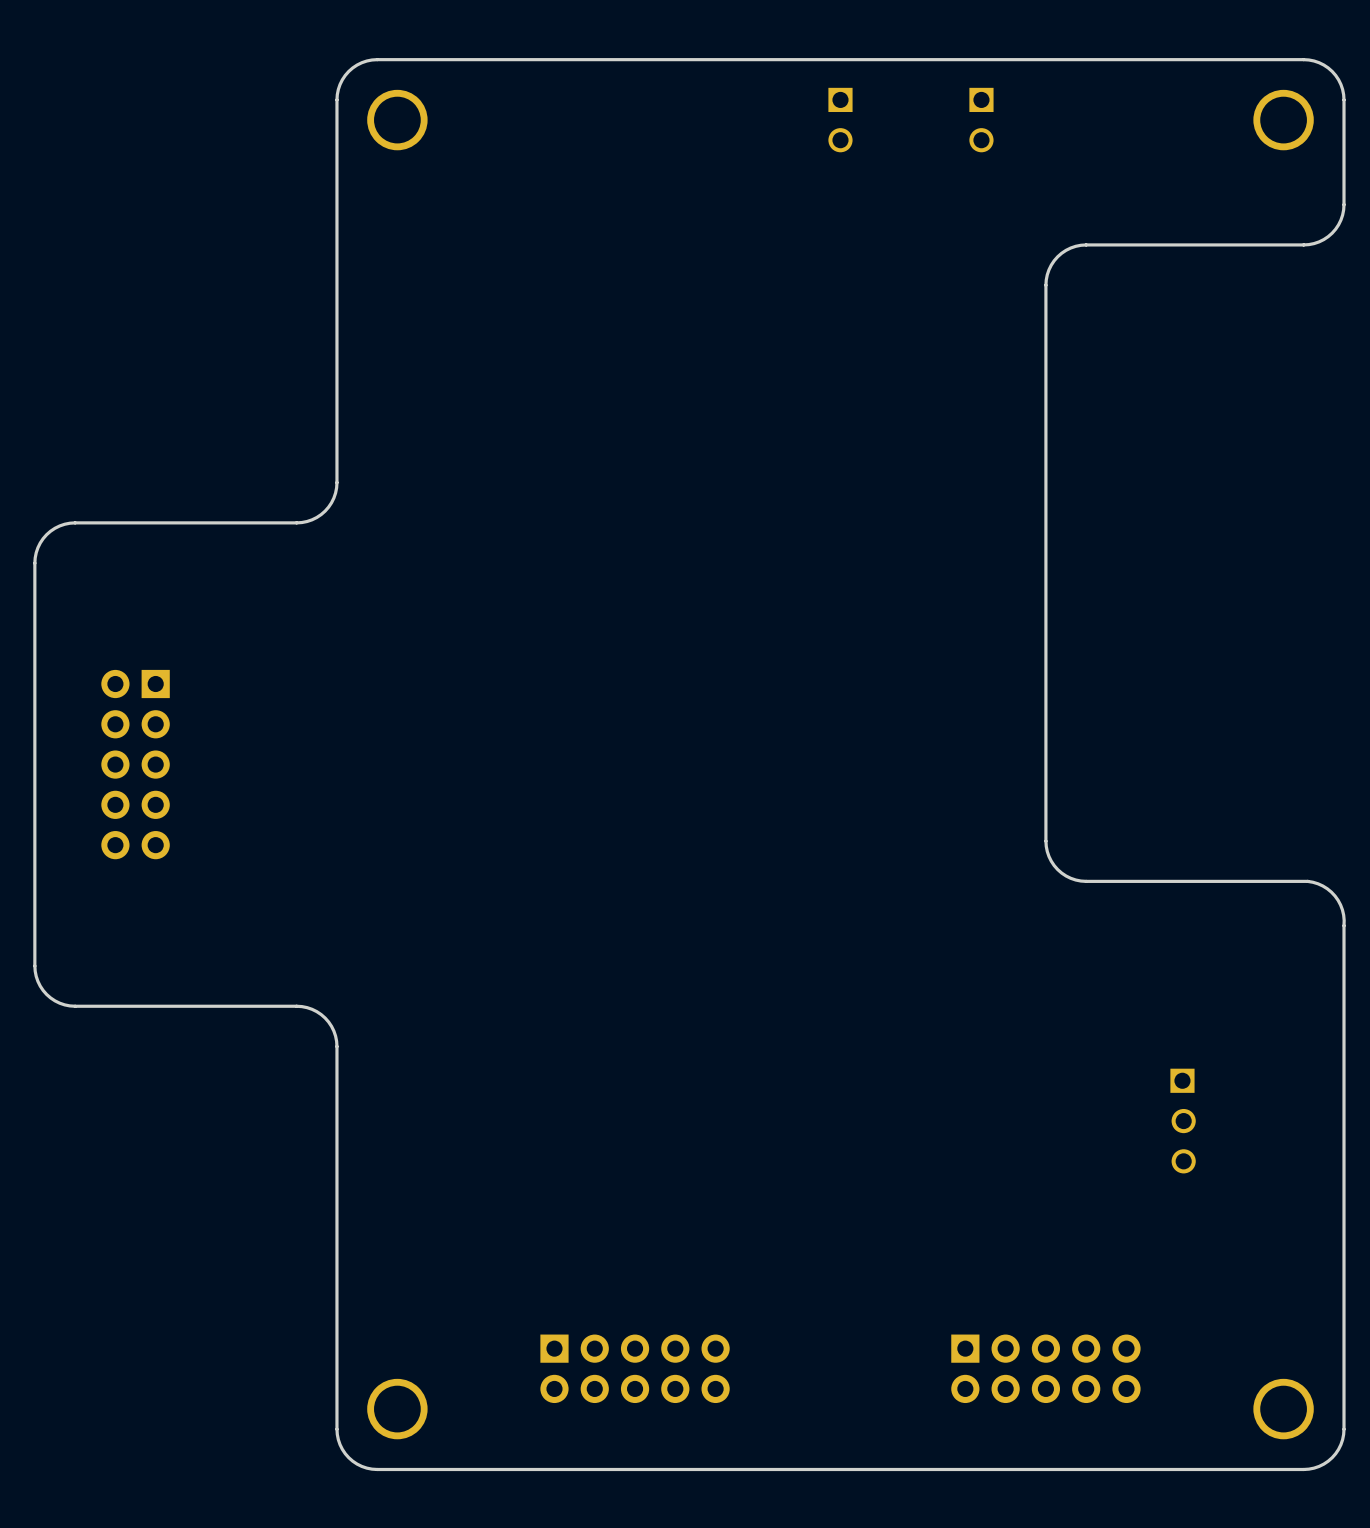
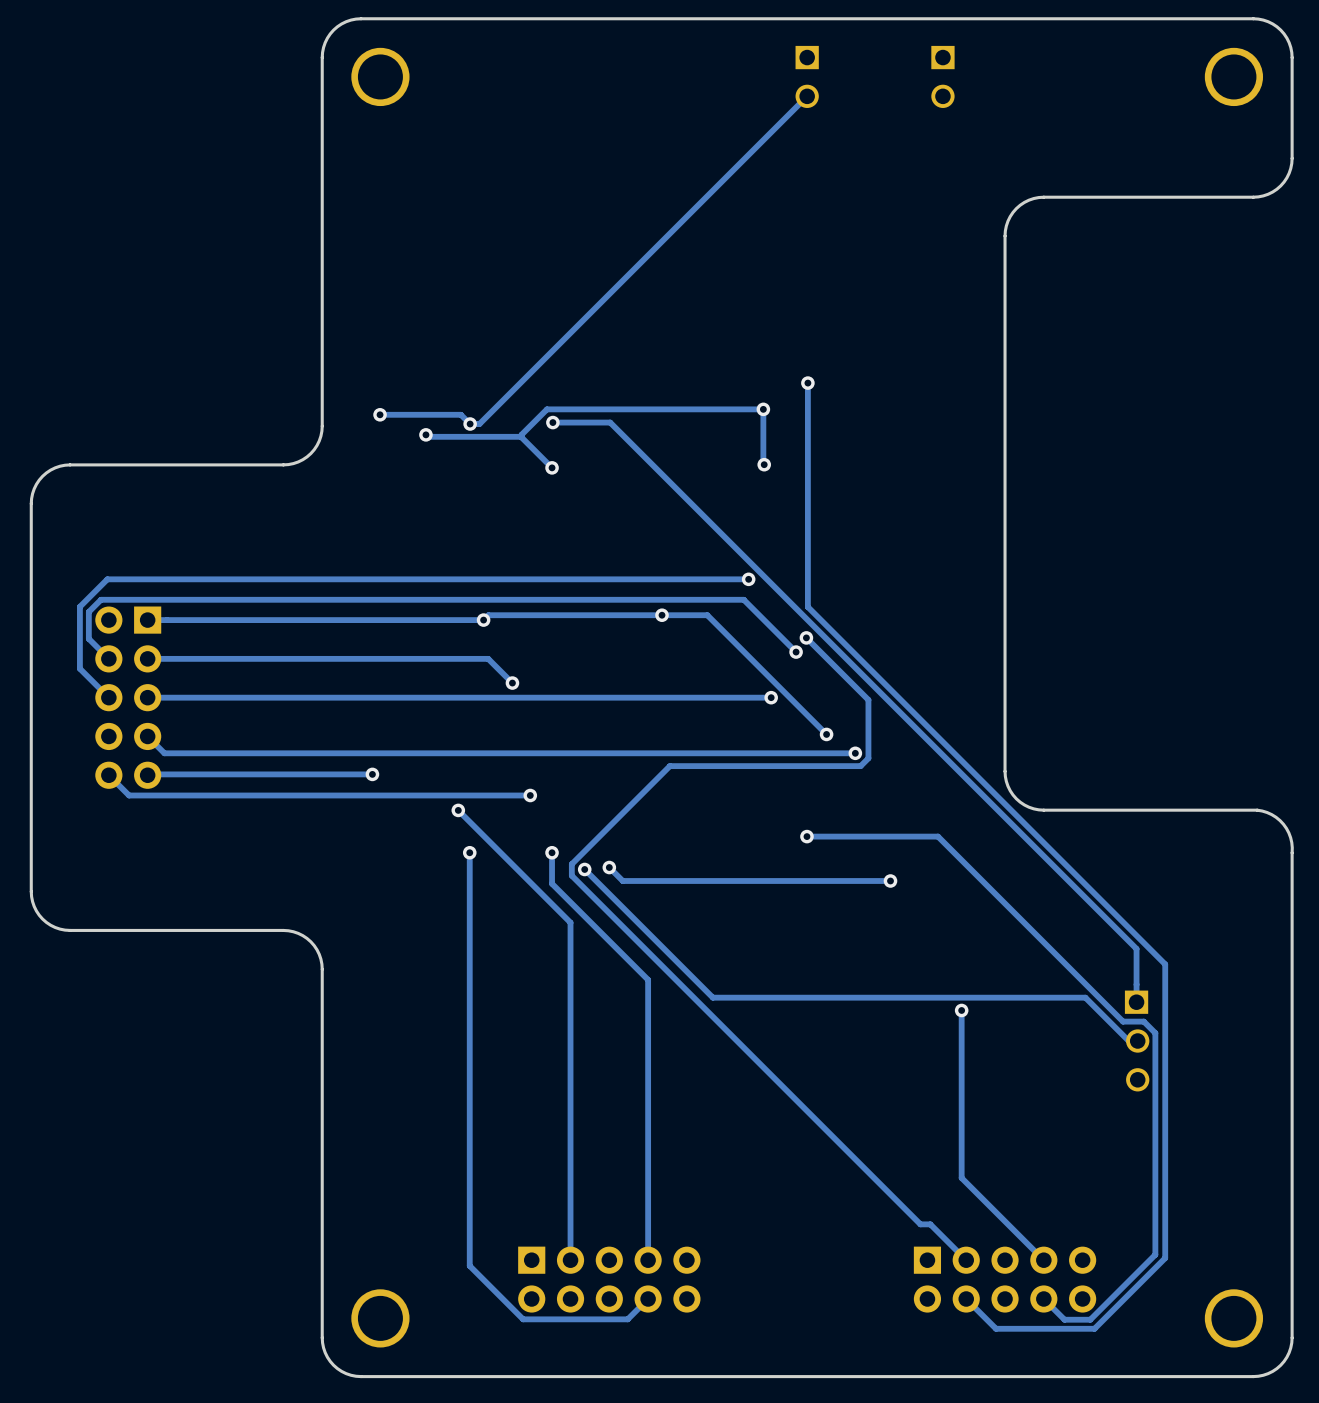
track: none -> (807, 96) (479, 424) (470, 424) (460, 414) (380, 414)
track: none -> (807, 383) (807, 607) (1165, 964) (1165, 1258) (1094, 1328) (996, 1328) (966, 1299)
via: none -> (807, 383)
via: none -> (763, 409)
via: none -> (380, 414)
track: none -> (552, 422) (610, 422) (1136, 948) (1136, 1002)
via: none -> (552, 422)
via: none -> (470, 424)
track: none -> (425, 434) (427, 436) (521, 436)
via: none -> (425, 434)
track: none -> (764, 464) (763, 409) (546, 409) (521, 434) (521, 437) (552, 467)
via: none -> (764, 464)
via: none -> (552, 467)
track: none -> (748, 579) (107, 579) (79, 606) (79, 668) (108, 697)
via: none -> (748, 579)
via: none -> (662, 615)
track: none -> (147, 620) (483, 620) (488, 615) (707, 615) (826, 734)
via: none -> (483, 620)
track: none -> (806, 637) (868, 699) (868, 758) (860, 766) (669, 766) (571, 864) (571, 875) (920, 1224) (930, 1224) (966, 1260)
via: none -> (806, 637)
track: none -> (796, 652) (743, 599) (100, 599) (88, 611) (88, 638) (108, 658)
via: none -> (796, 652)
track: none -> (147, 658) (488, 658) (512, 683)
via: none -> (512, 683)
track: none -> (771, 697) (147, 697)
via: none -> (771, 697)
via: none -> (826, 734)
track: none -> (147, 736) (164, 753) (855, 753)
via: none -> (855, 753)
track: none -> (372, 774) (147, 775)
via: none -> (372, 774)
track: none -> (108, 775) (129, 795) (530, 795)
via: none -> (530, 795)
track: none -> (458, 810) (570, 922) (570, 1260)
via: none -> (458, 810)
track: none -> (806, 836) (938, 836) (1123, 1021) (1143, 1021) (1155, 1033) (1155, 1254) (1090, 1319) (1064, 1319) (1043, 1299)
via: none -> (806, 836)
track: none -> (469, 852) (469, 1265) (523, 1319) (627, 1319) (648, 1299)
via: none -> (469, 852)
track: none -> (552, 852) (552, 883) (648, 979) (648, 1260)
via: none -> (552, 852)
track: none -> (609, 867) (622, 880) (890, 880)
via: none -> (609, 867)
track: none -> (584, 869) (712, 997) (1085, 997) (1128, 1041) (1137, 1041)
via: none -> (584, 869)
via: none -> (890, 880)
track: none -> (961, 1010) (961, 1178) (1043, 1260)
via: none -> (961, 1010)

